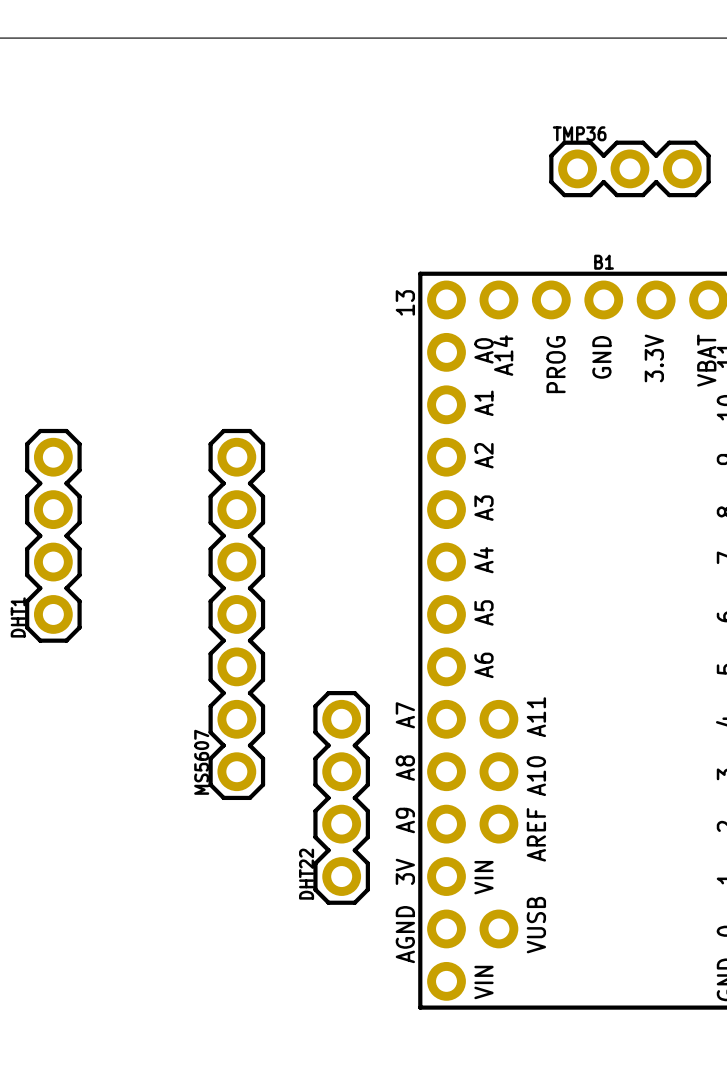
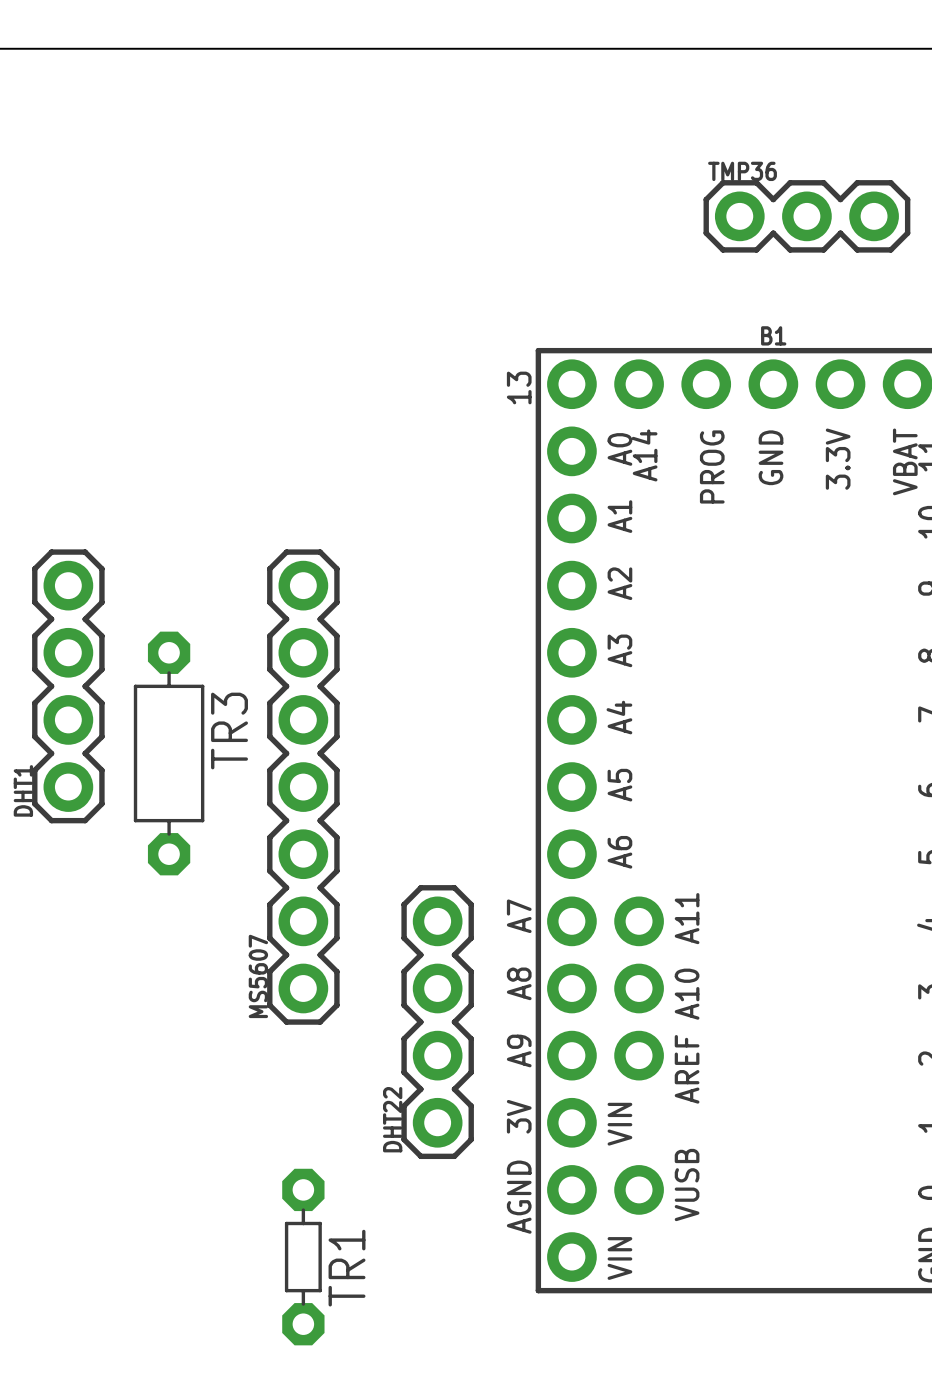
TR3: none -> (169, 753)
TR1: none -> (303, 1257)

